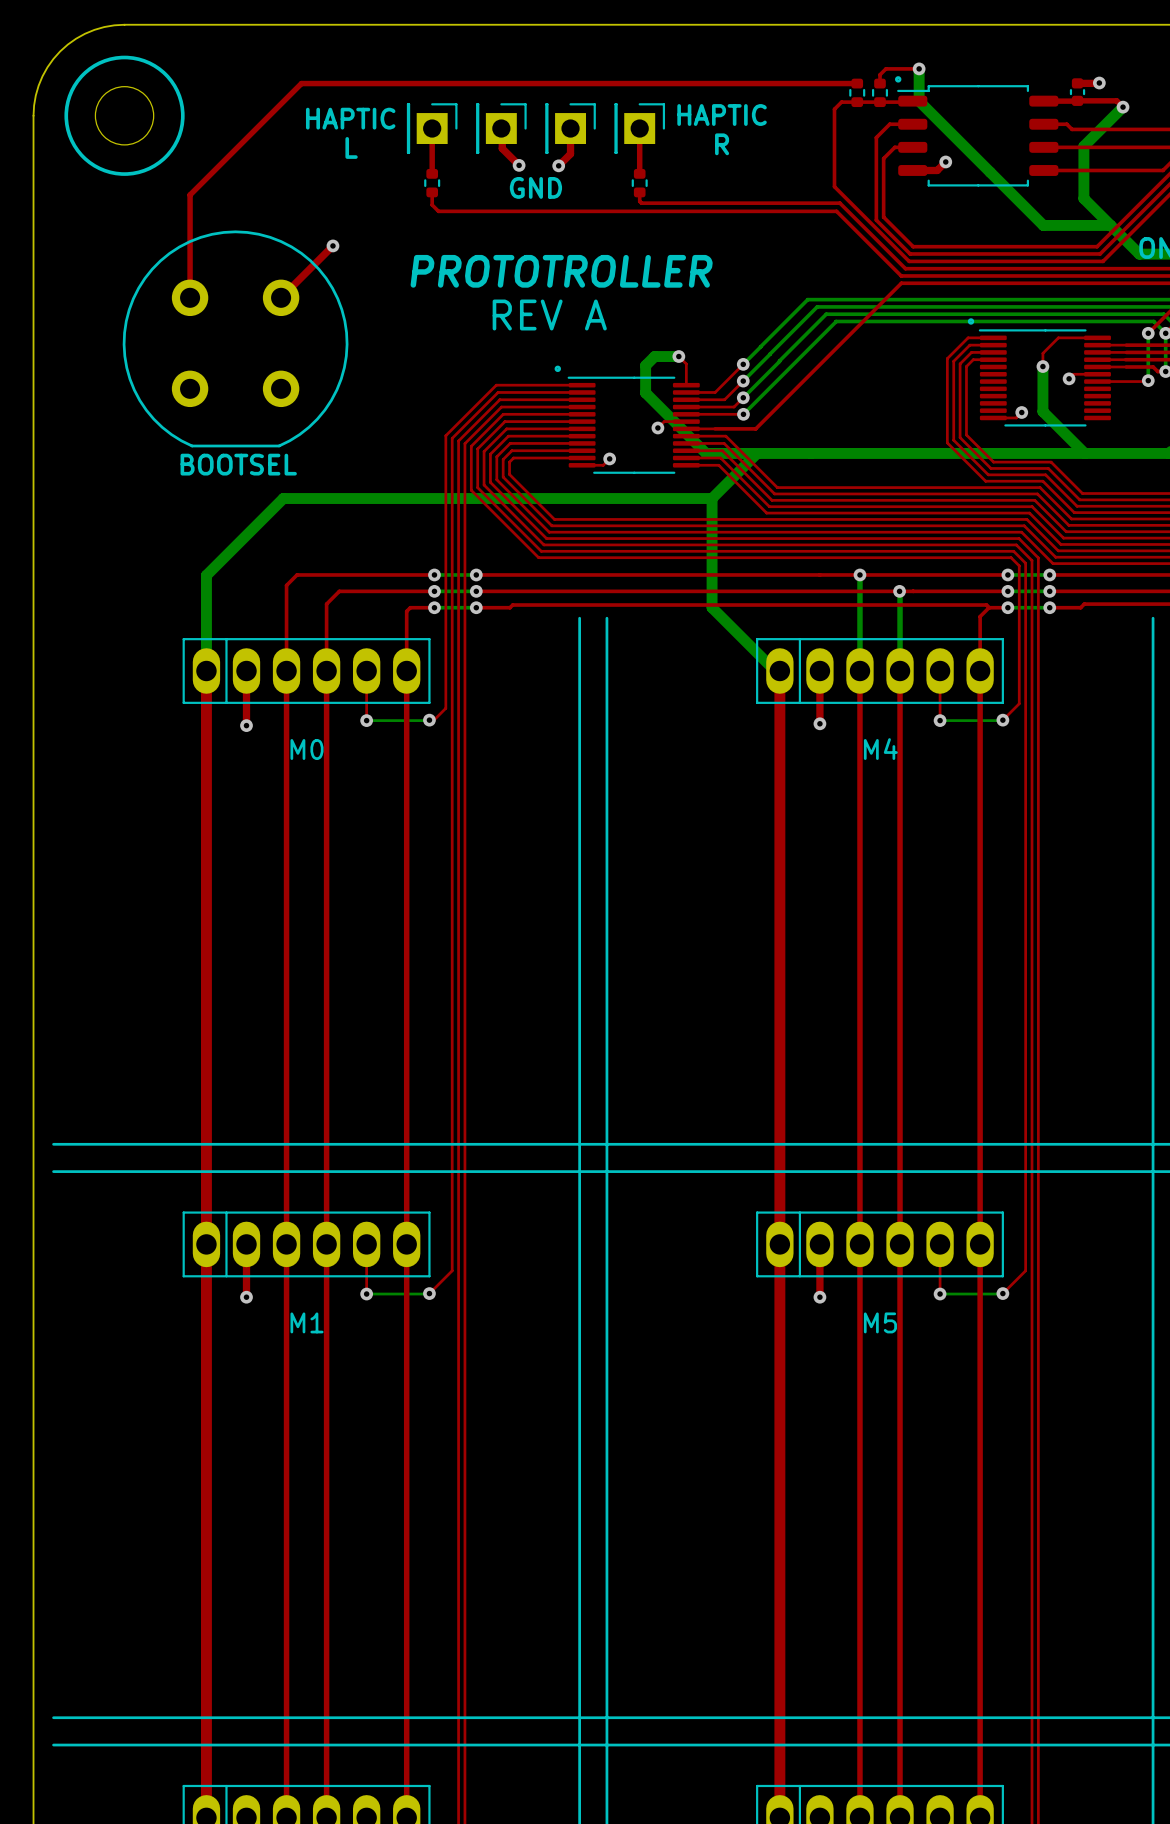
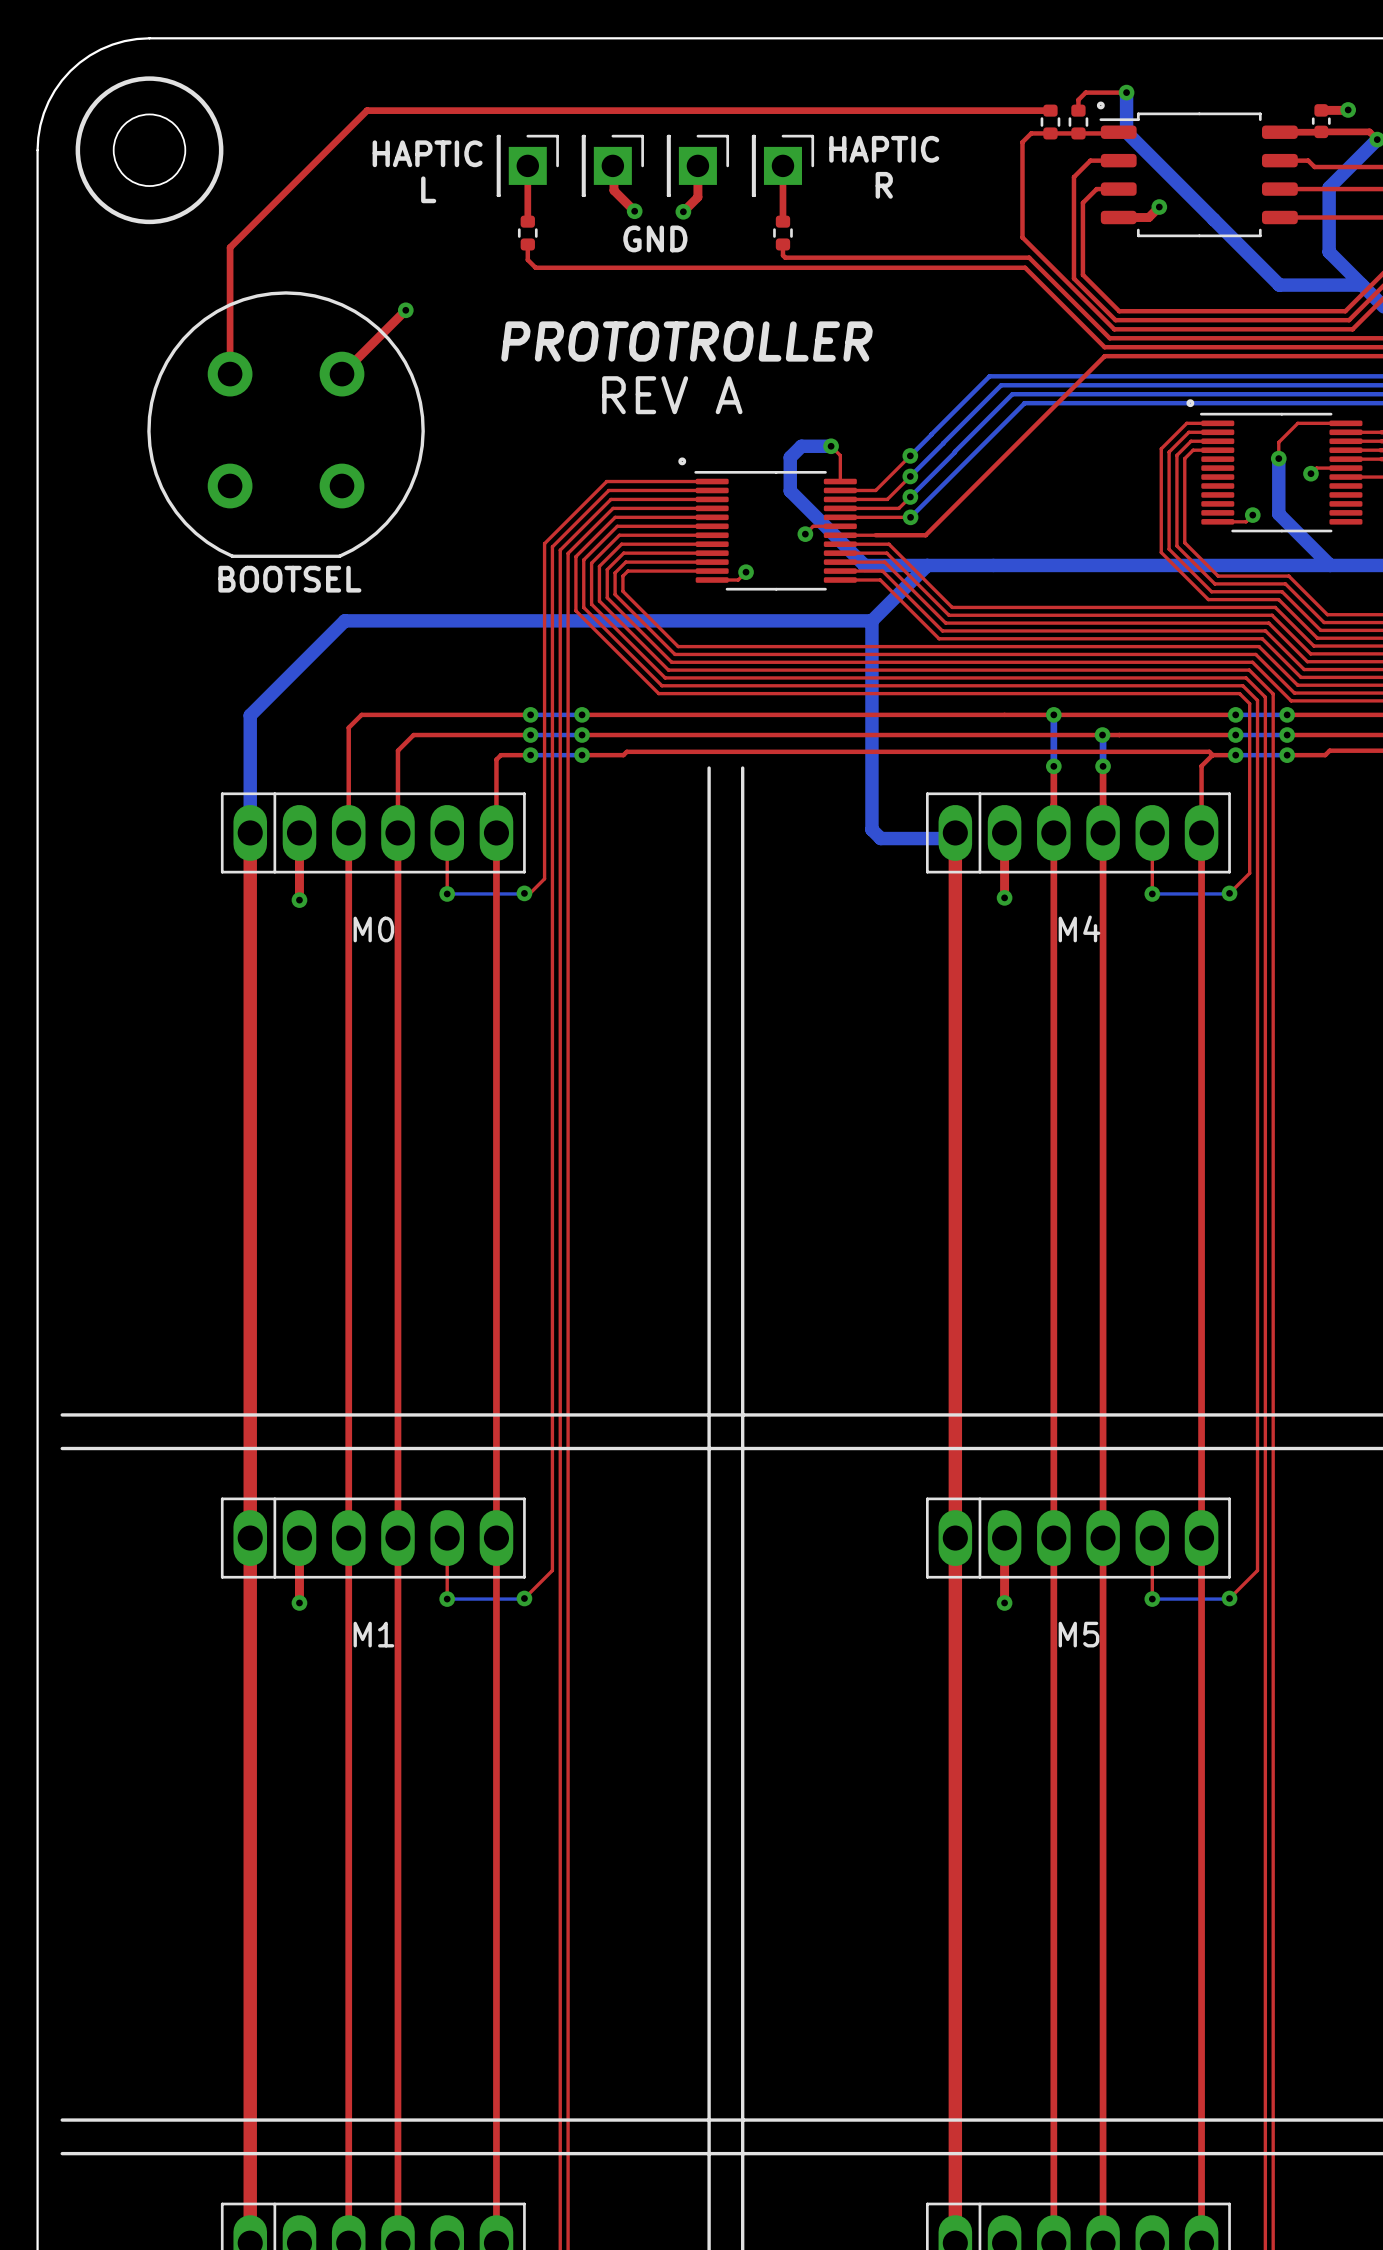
bottom track: (712, 607) (775, 671) (779, 671) -> (871, 755) (871, 829) (880, 838) (955, 838)
top track: none -> (1053, 766) (1053, 832)
bottom track: (859, 616) (859, 671) -> none
via: none -> (1053, 766)
top track: none -> (1103, 766) (1103, 832)
bottom track: (900, 616) (900, 671) -> none
via: none -> (1103, 766)

